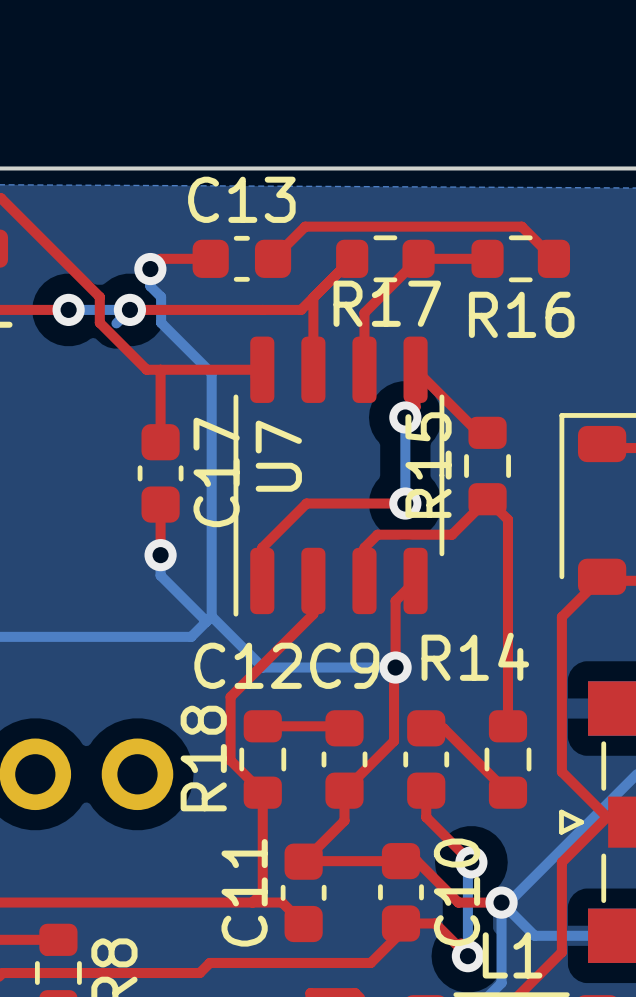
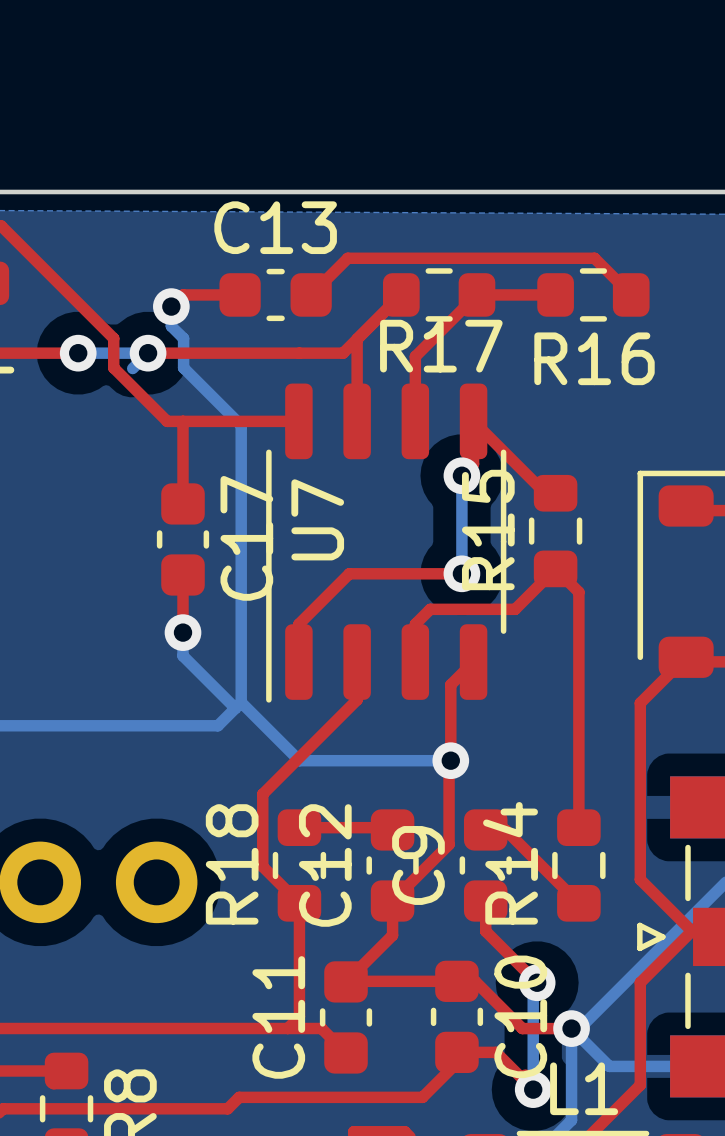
R14 name rotation: 0° (475, 656) -> 90° counterclockwise (510, 863)
C12 name rotation: 0° (248, 665) -> 90° counterclockwise (325, 865)
C9 name rotation: 0° (344, 665) -> 90° counterclockwise (418, 865)

